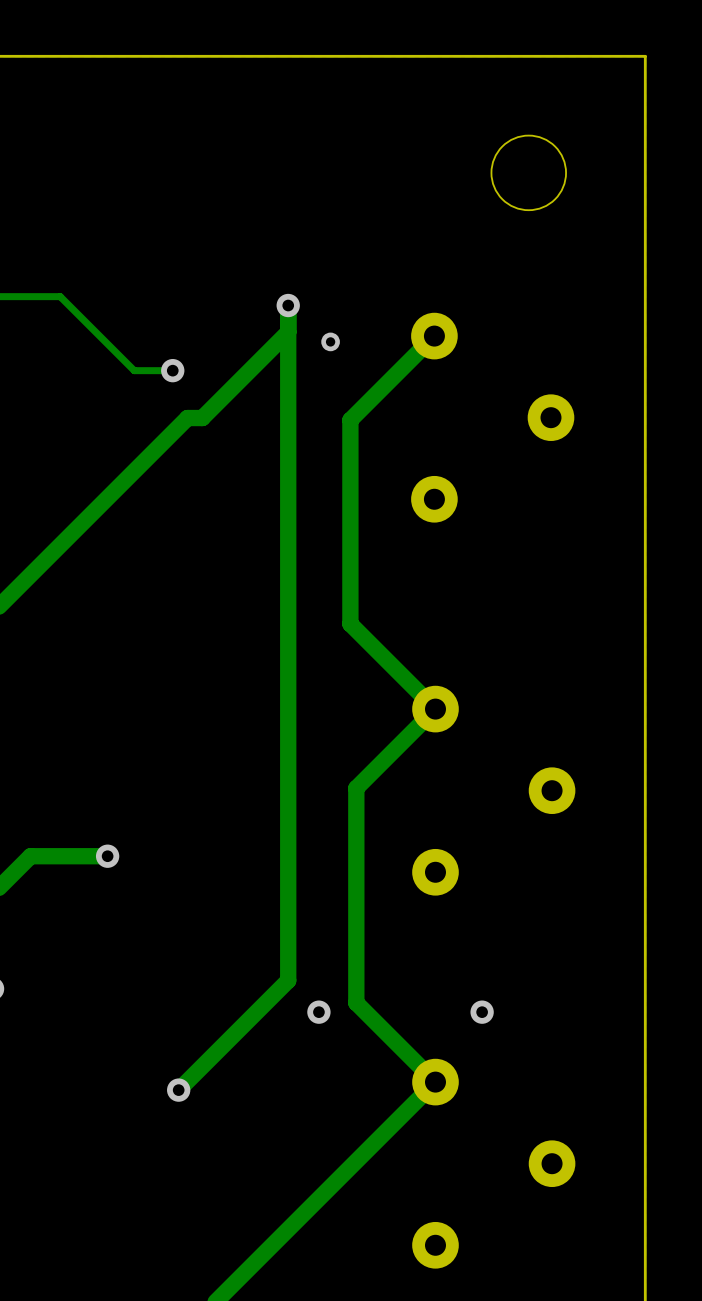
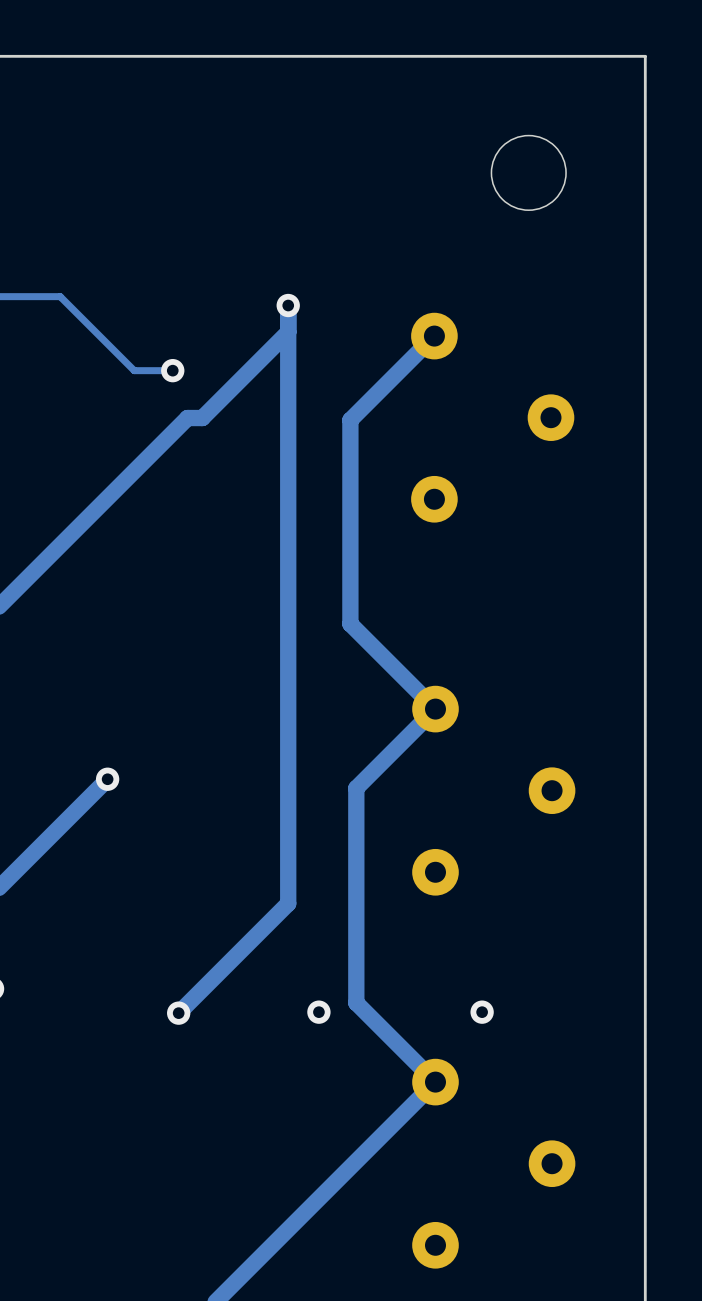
via: (330, 341) -> none
via: none -> (107, 779)
track: (107, 856) (30, 856) -> (107, 779) (30, 856)
via: (107, 856) -> none
track: (288, 903) (288, 980) (178, 1090) -> (288, 903) (178, 1013)
via position: (178, 1090) -> (178, 1013)

